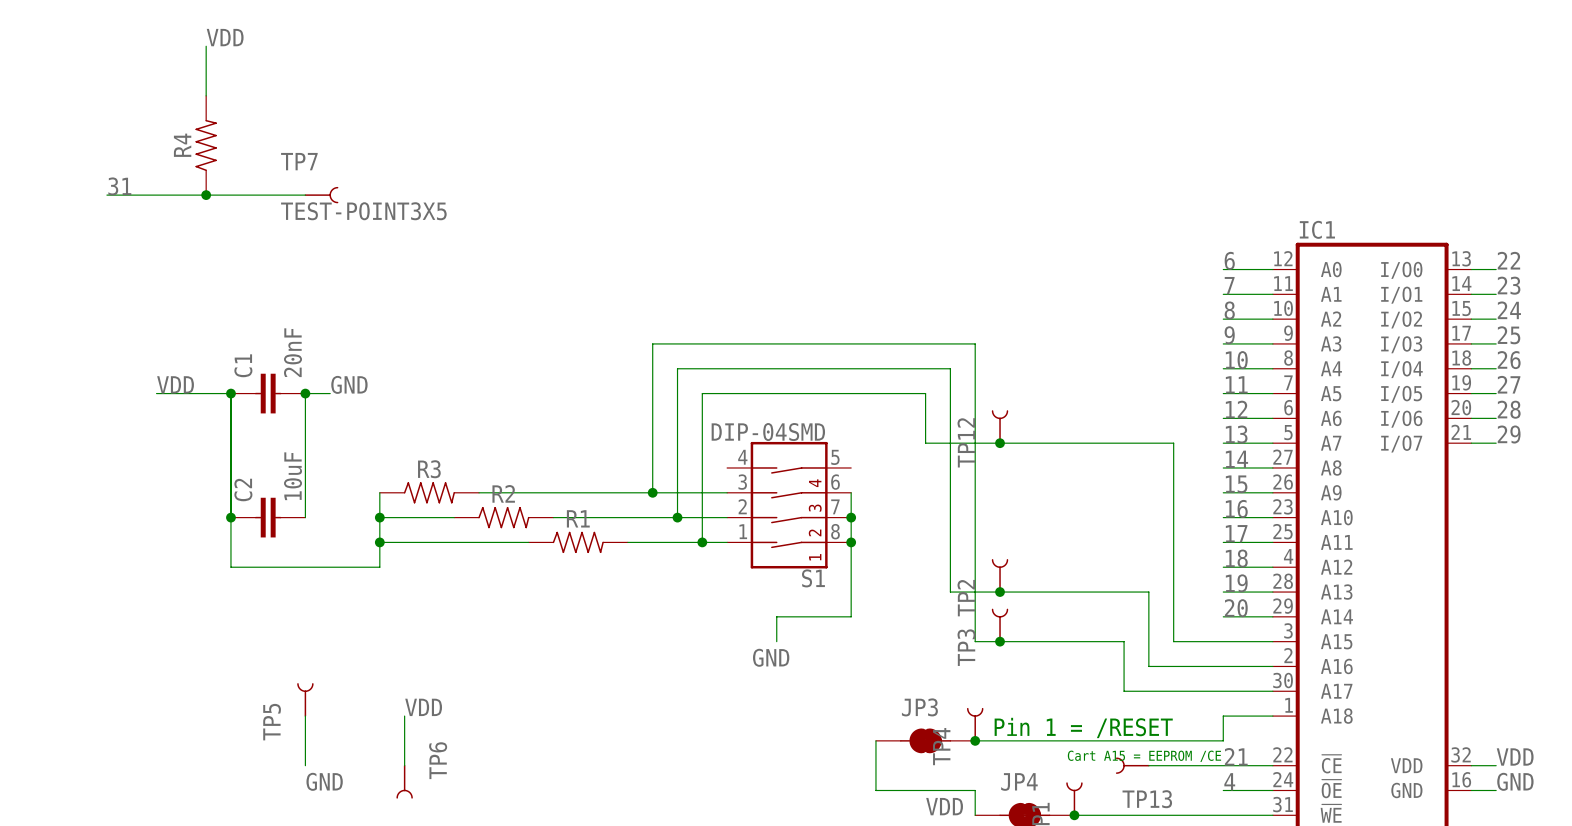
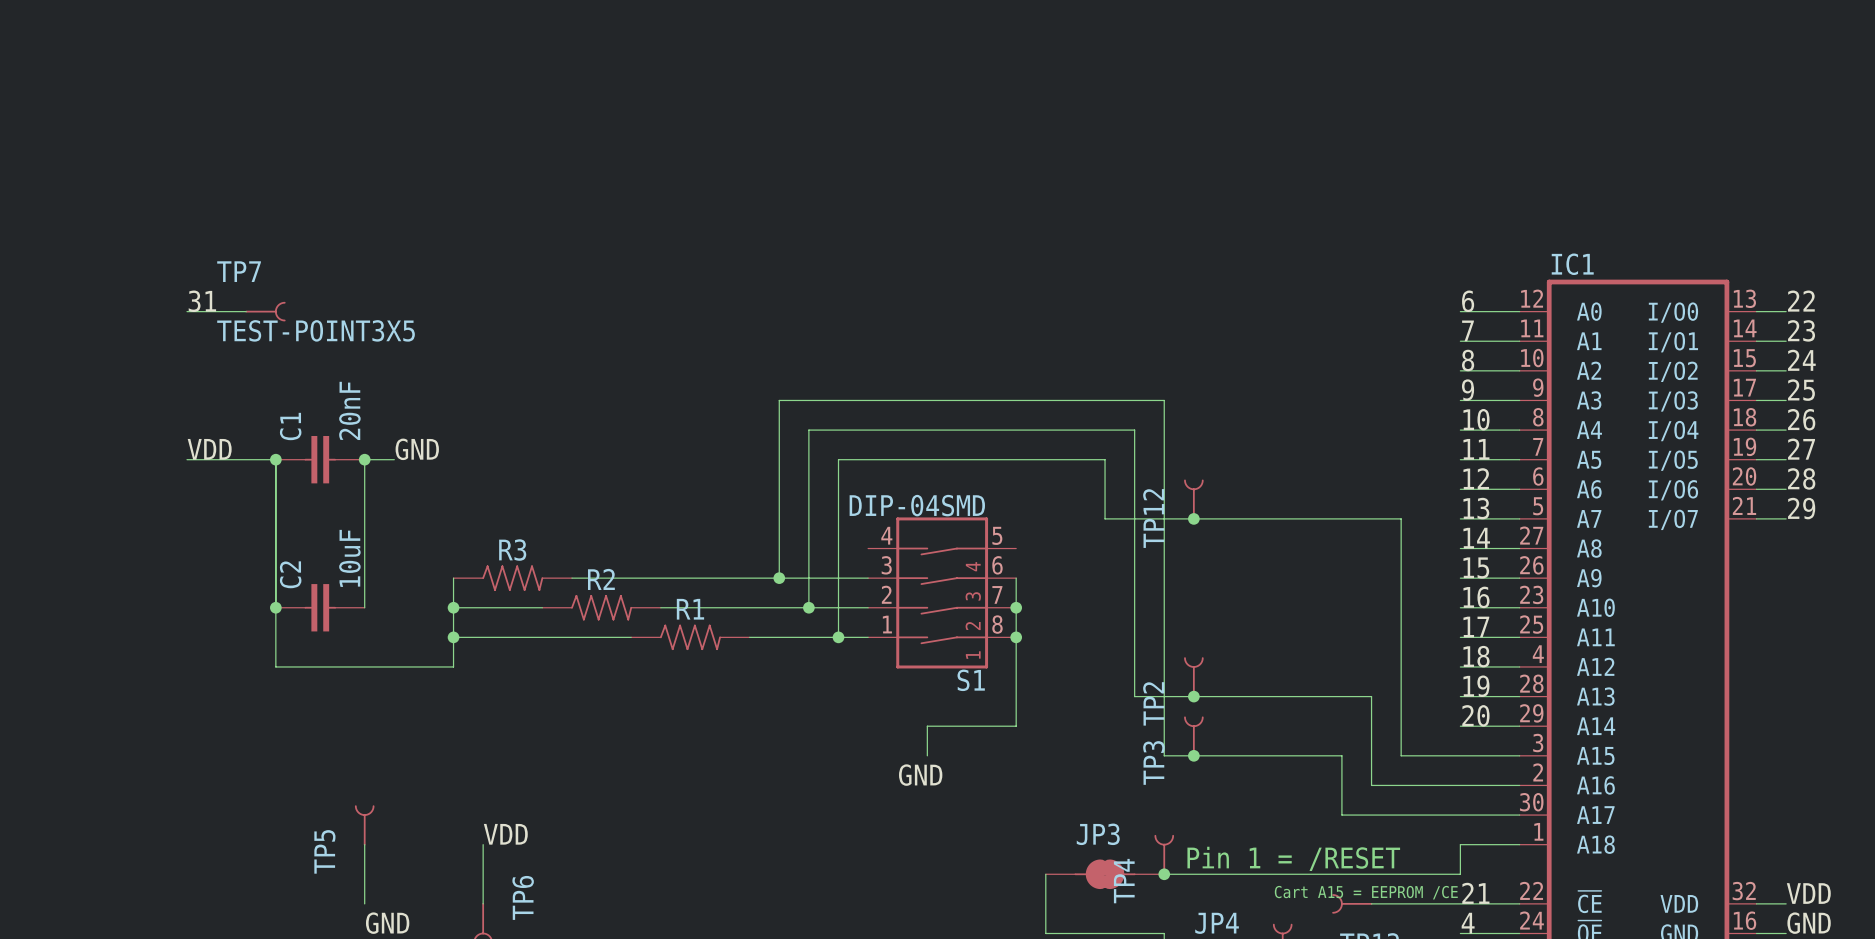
label: VDD (225, 37) -> none
wire: (206, 46) (206, 95) -> none
R4: (206, 145) -> none
label position: 31 (119, 186) -> 31 (202, 301)
wire: (106, 195) (305, 195) -> none
junction: (206, 195) -> none
TP7 position: (321, 195) -> (265, 311)
wire: none -> (187, 311) (246, 311)

